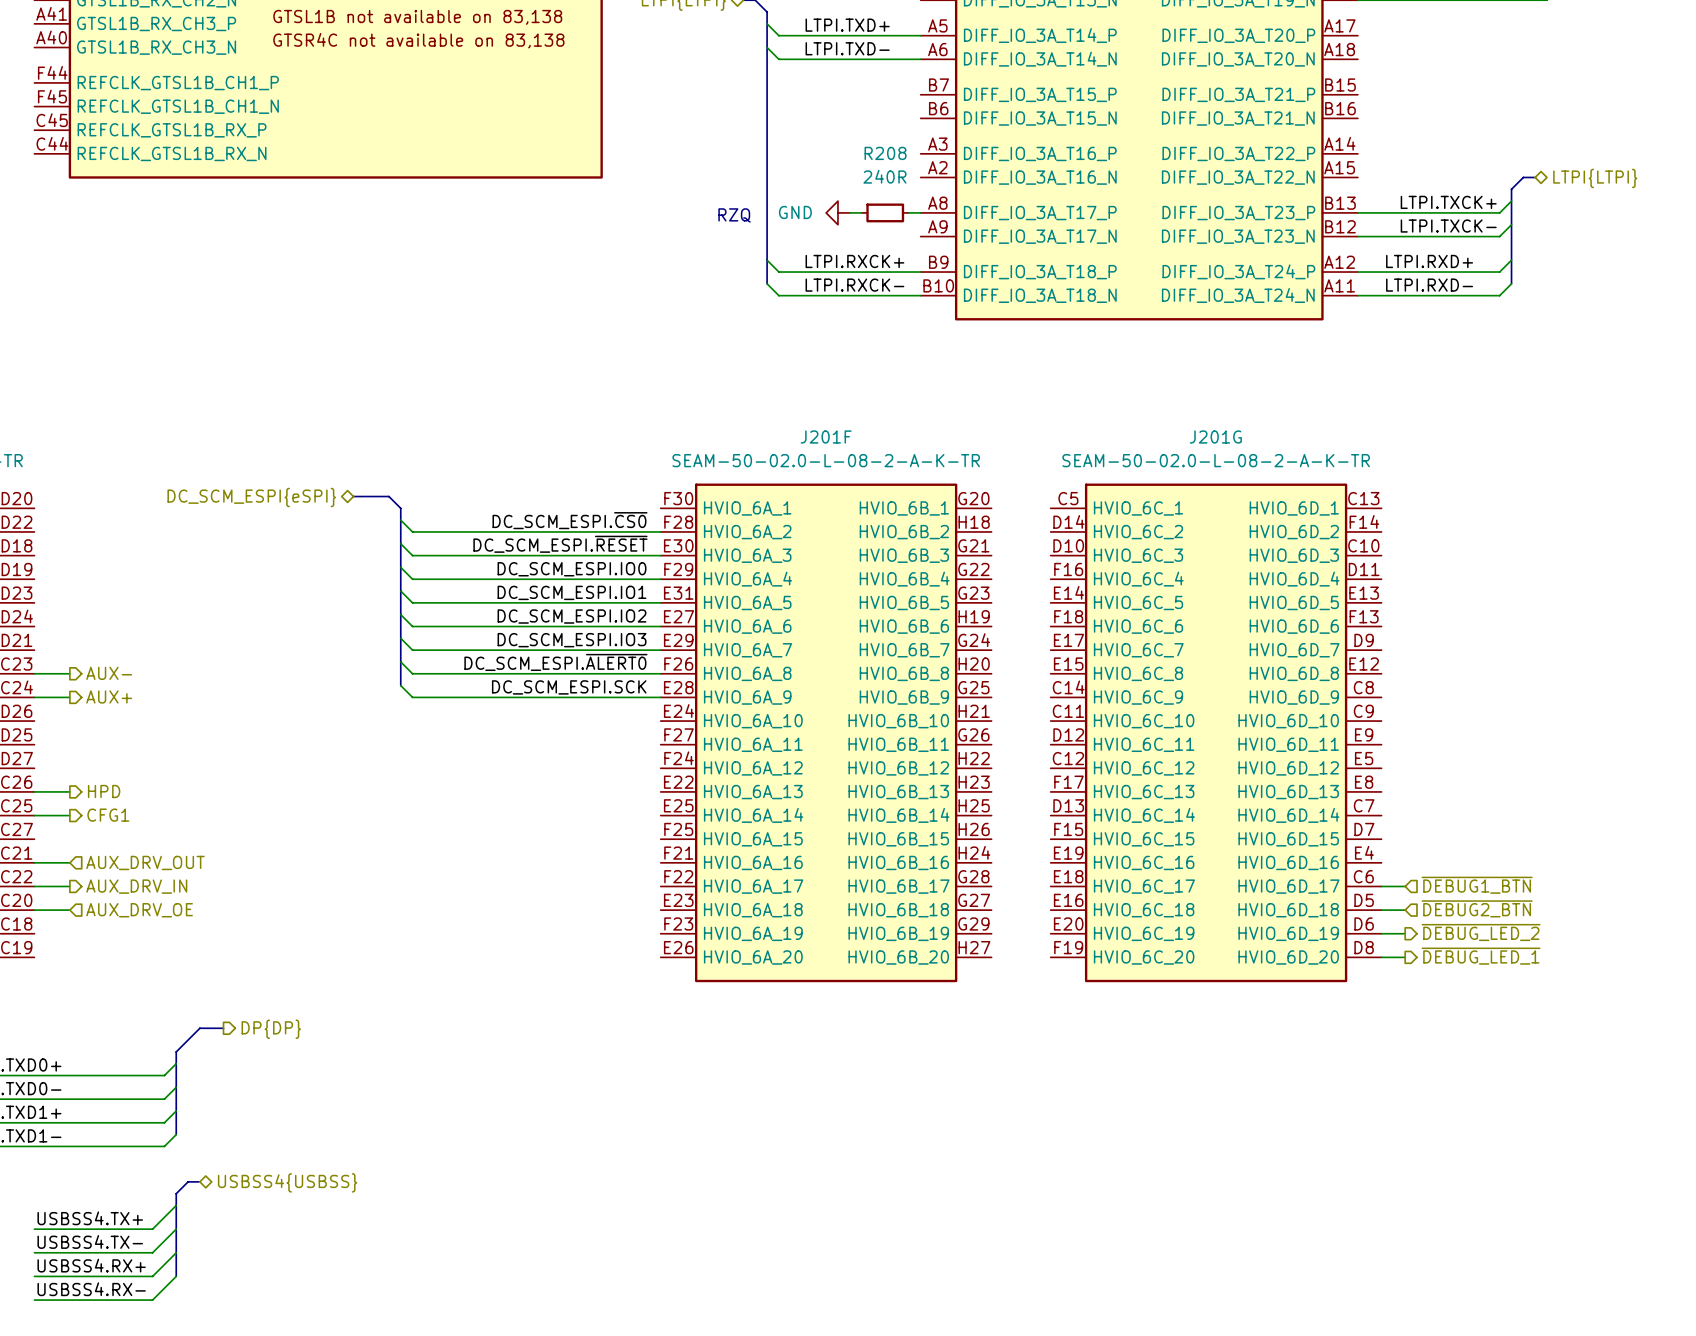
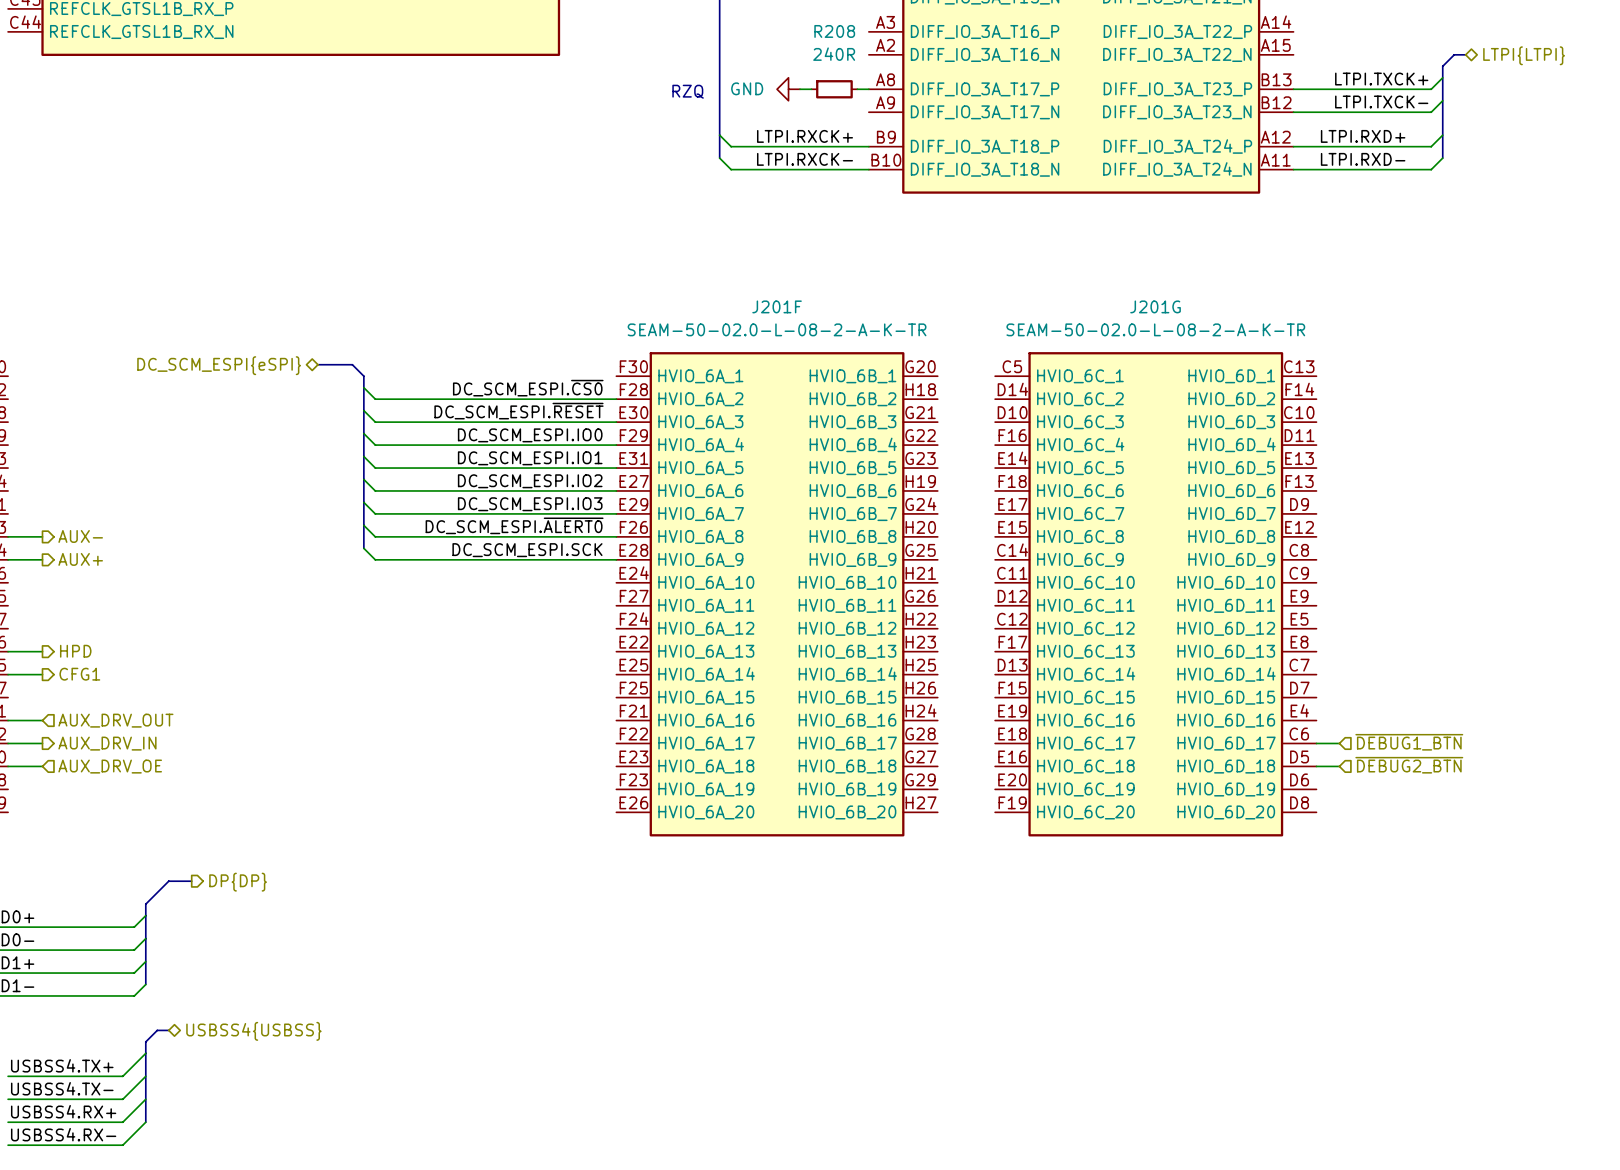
hierarchical label: ~{DEBUG_LED_2} (1481, 932) -> none
wire: (1381, 933) (1405, 933) -> none
hierarchical label: ~{DEBUG_LED_1} (1481, 956) -> none
wire: (1381, 957) (1405, 957) -> none

